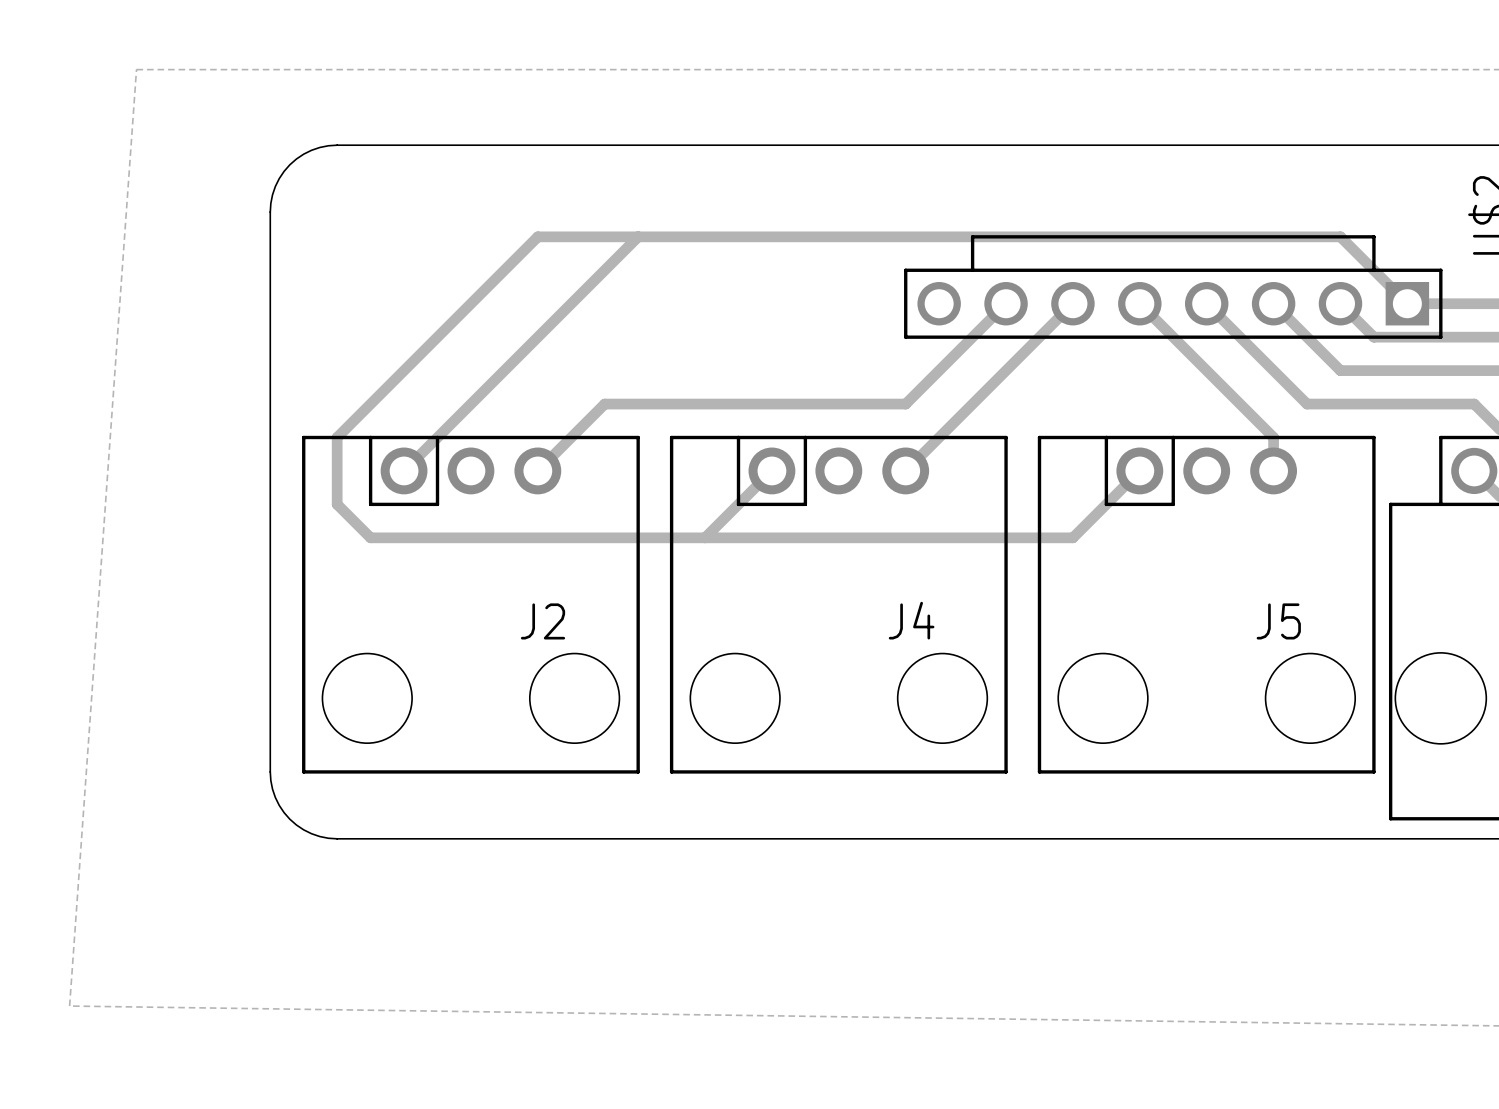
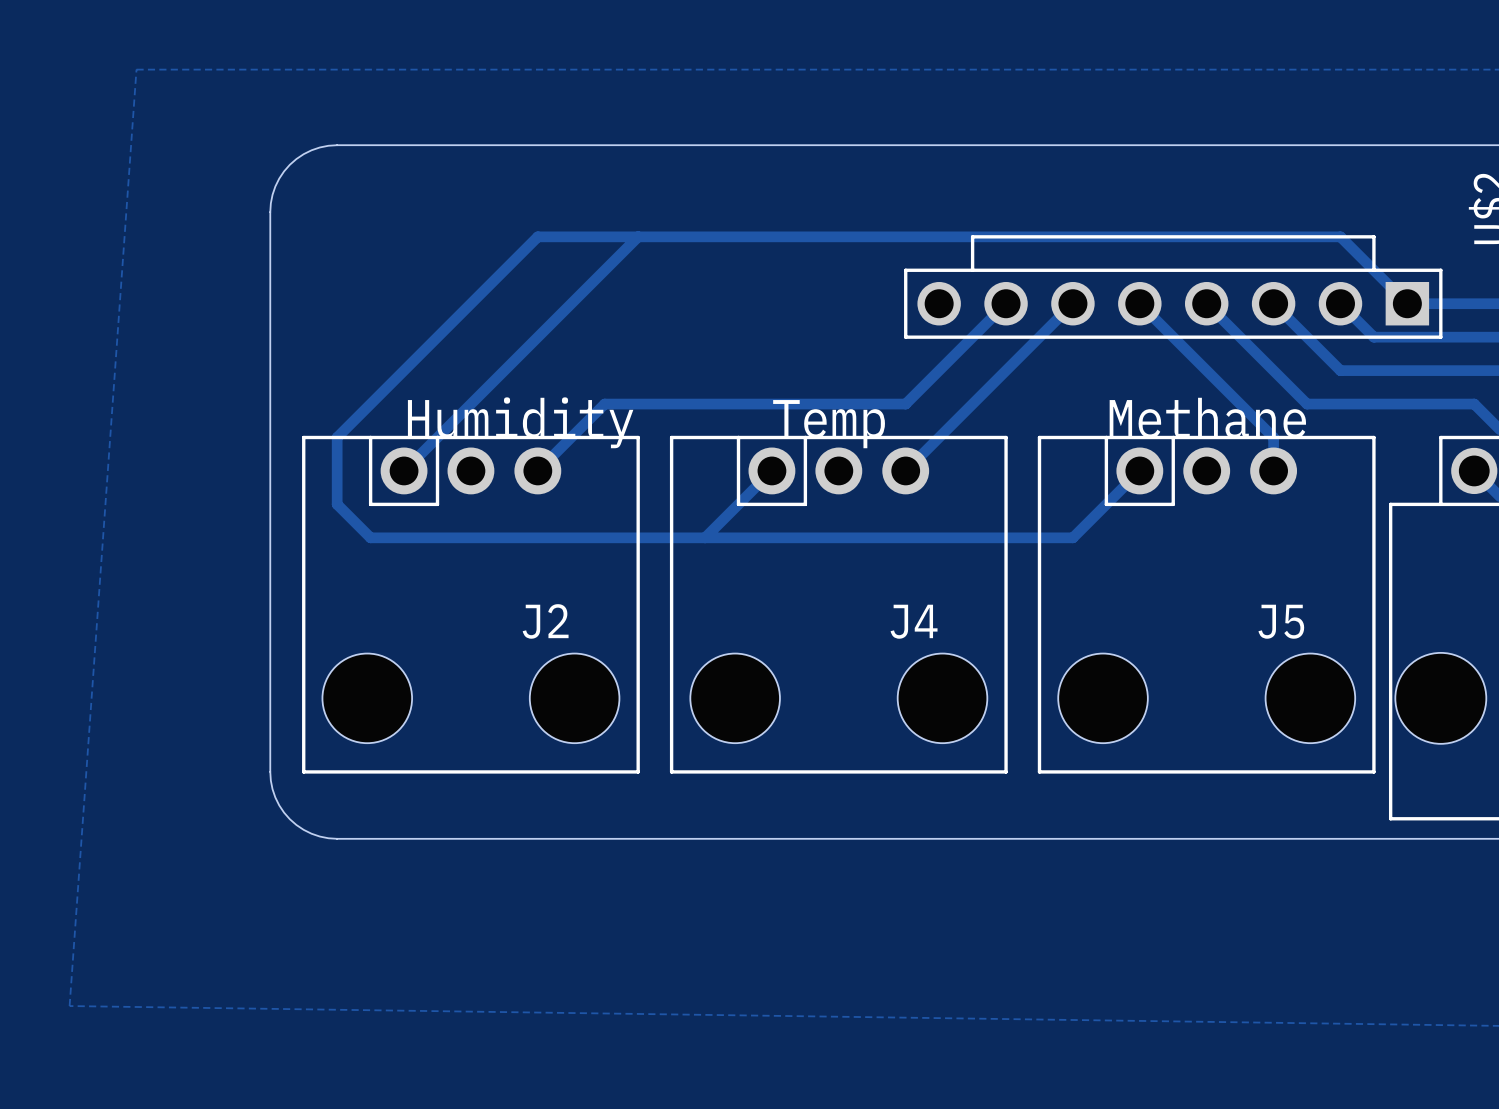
text: none -> Methane (1207, 417)
text: none -> Humidity (520, 422)
text: none -> Temp (829, 424)

